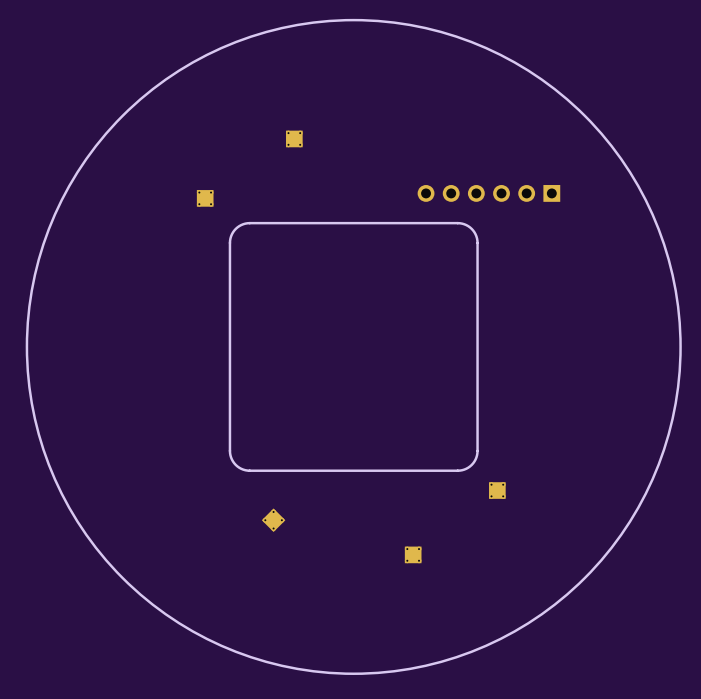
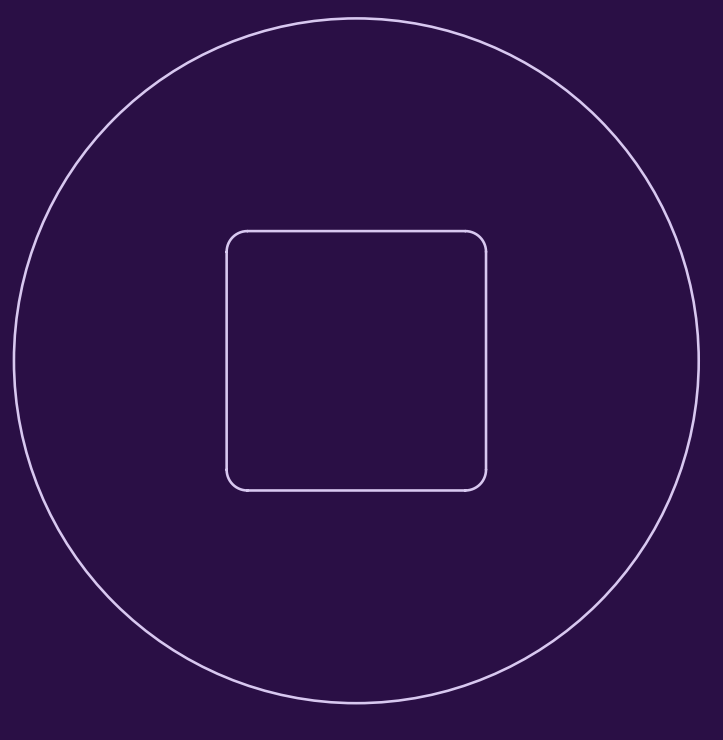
part: (294, 138) -> none
part: (488, 193) -> none
part: (205, 198) -> none
part: (497, 490) -> none
part: (273, 520) -> none
part: (413, 554) -> none

